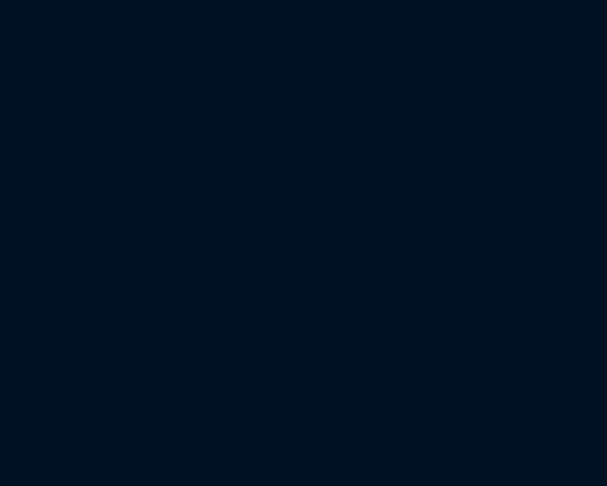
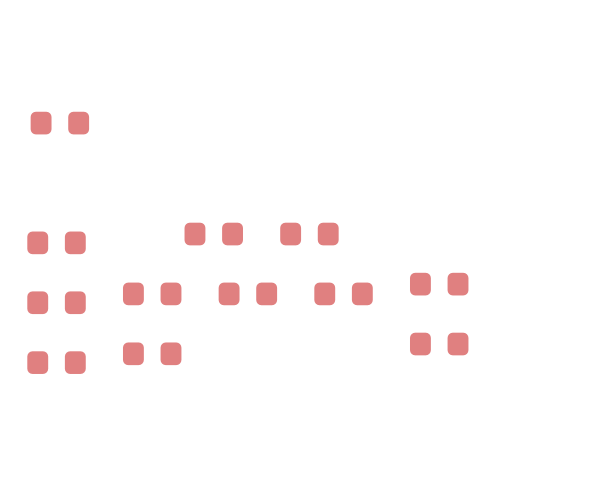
part: none -> (59, 123)
part: none -> (213, 234)
part: none -> (309, 234)
part: none -> (56, 242)
part: none -> (439, 284)
part: none -> (152, 293)
part: none -> (247, 293)
part: none -> (343, 293)
part: none -> (56, 302)
part: none -> (439, 344)
part: none -> (152, 353)
part: none -> (56, 362)

